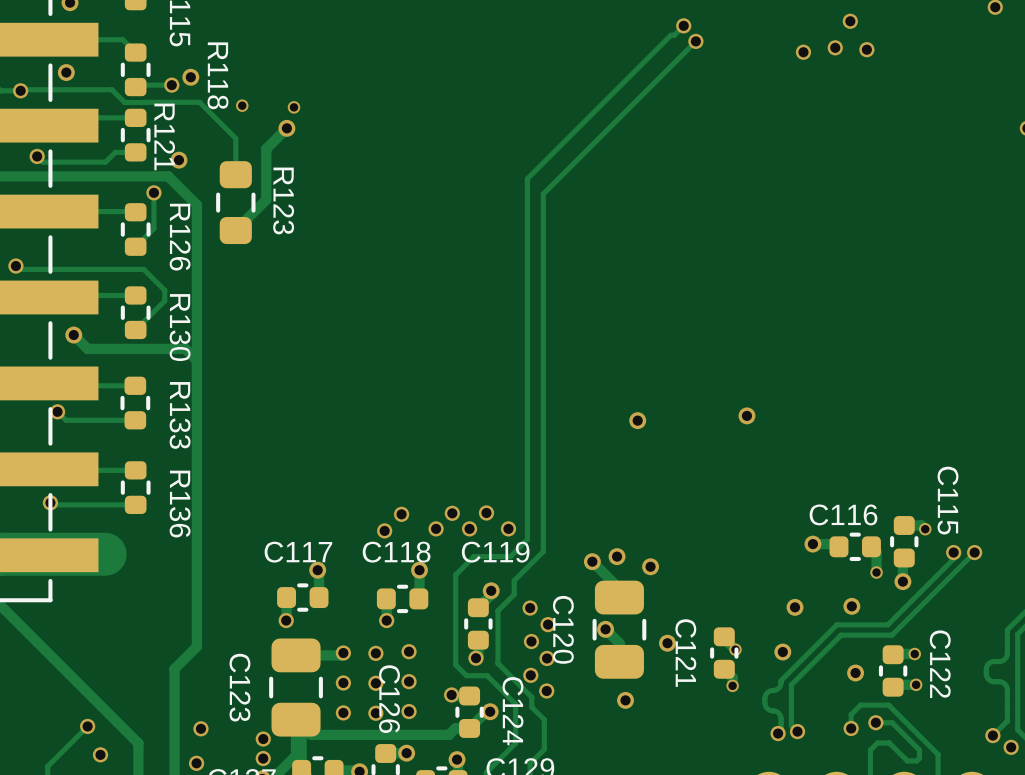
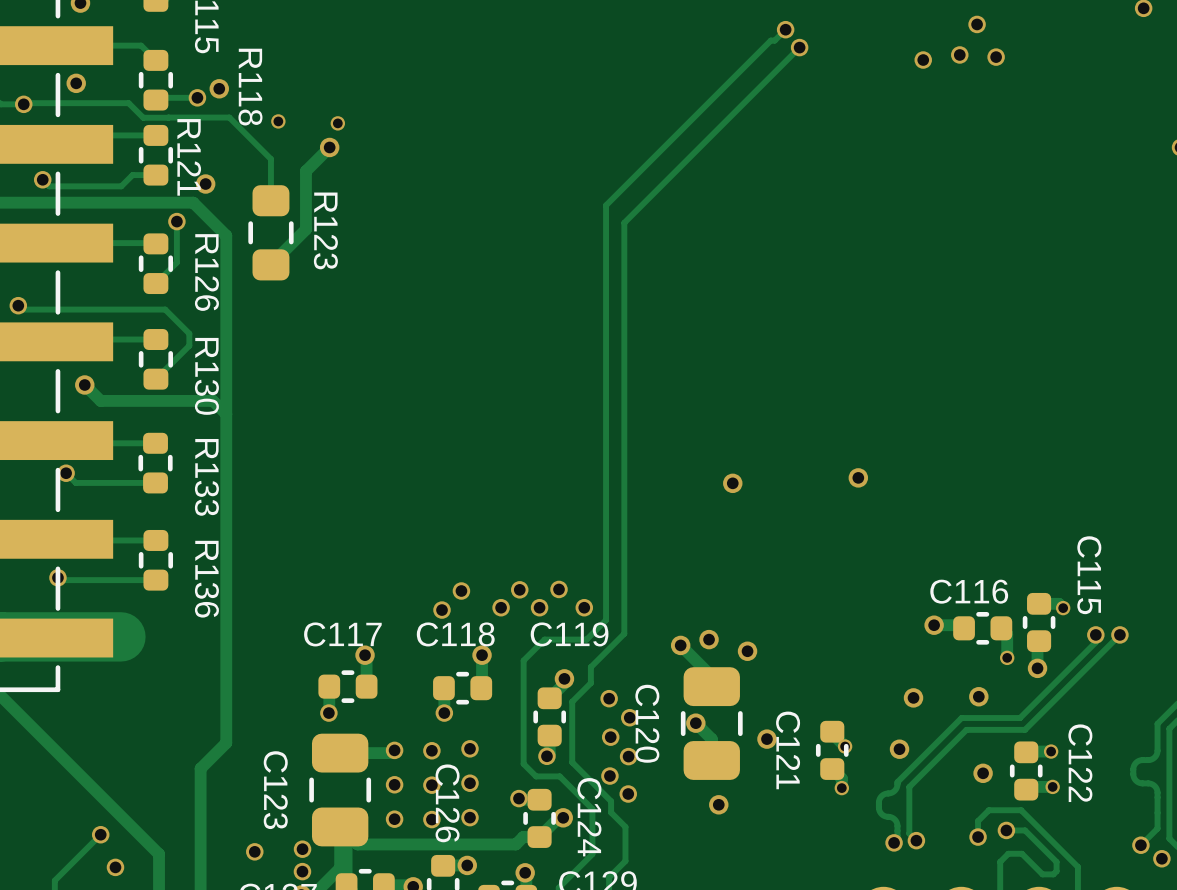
via: (200, 728) -> none
via: none -> (254, 851)
via: (196, 763) -> none

